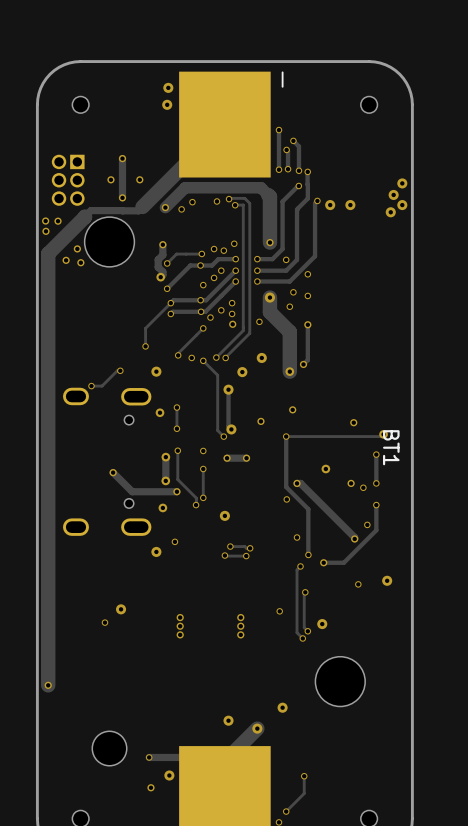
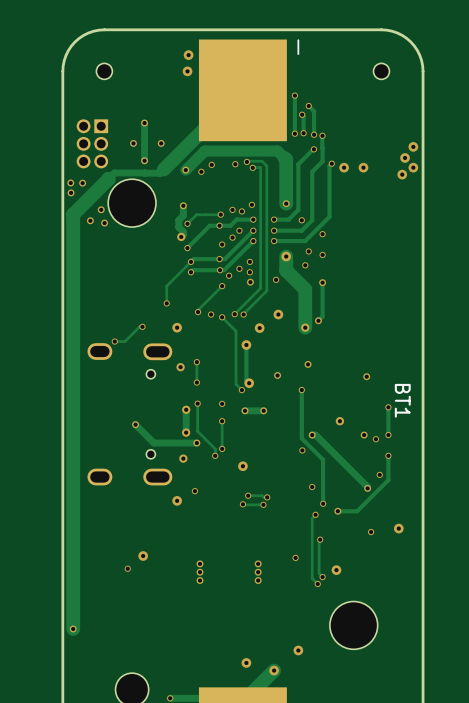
track: (383, 434) (381, 436) (286, 436) -> none
via: (383, 434) -> none

